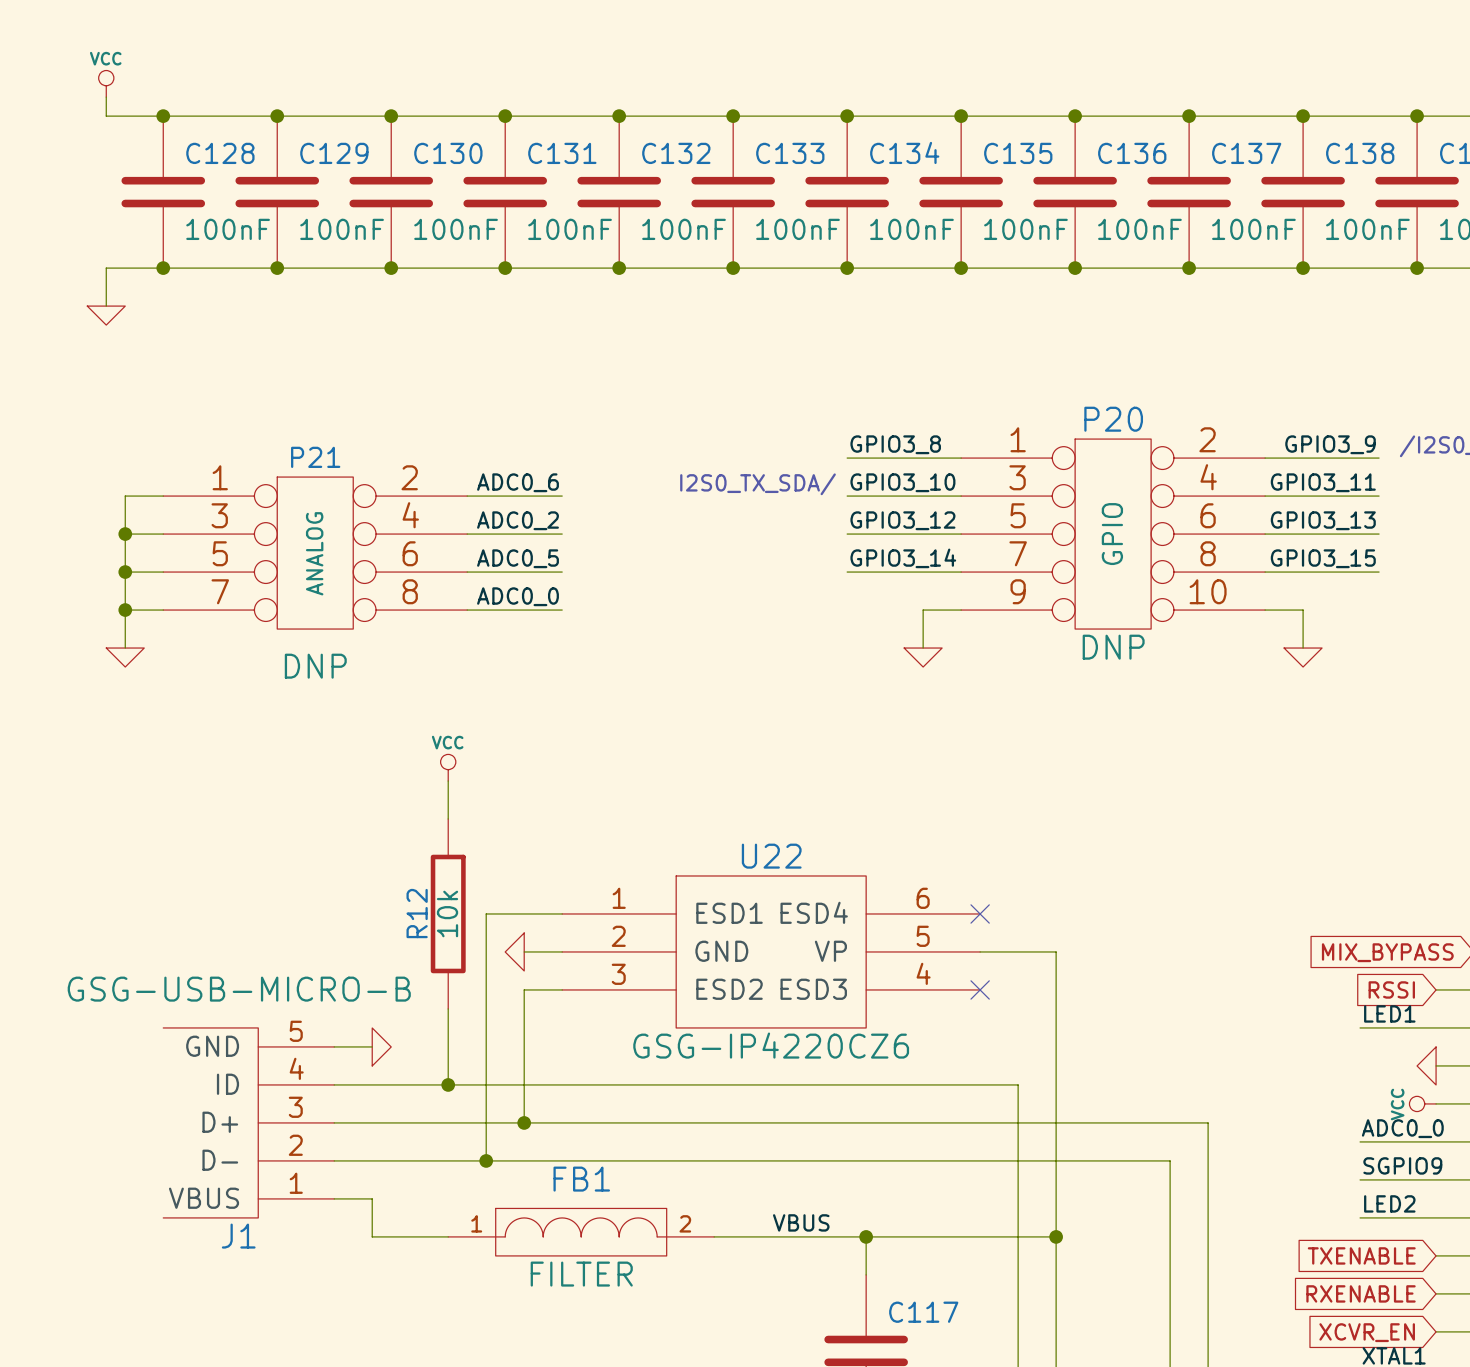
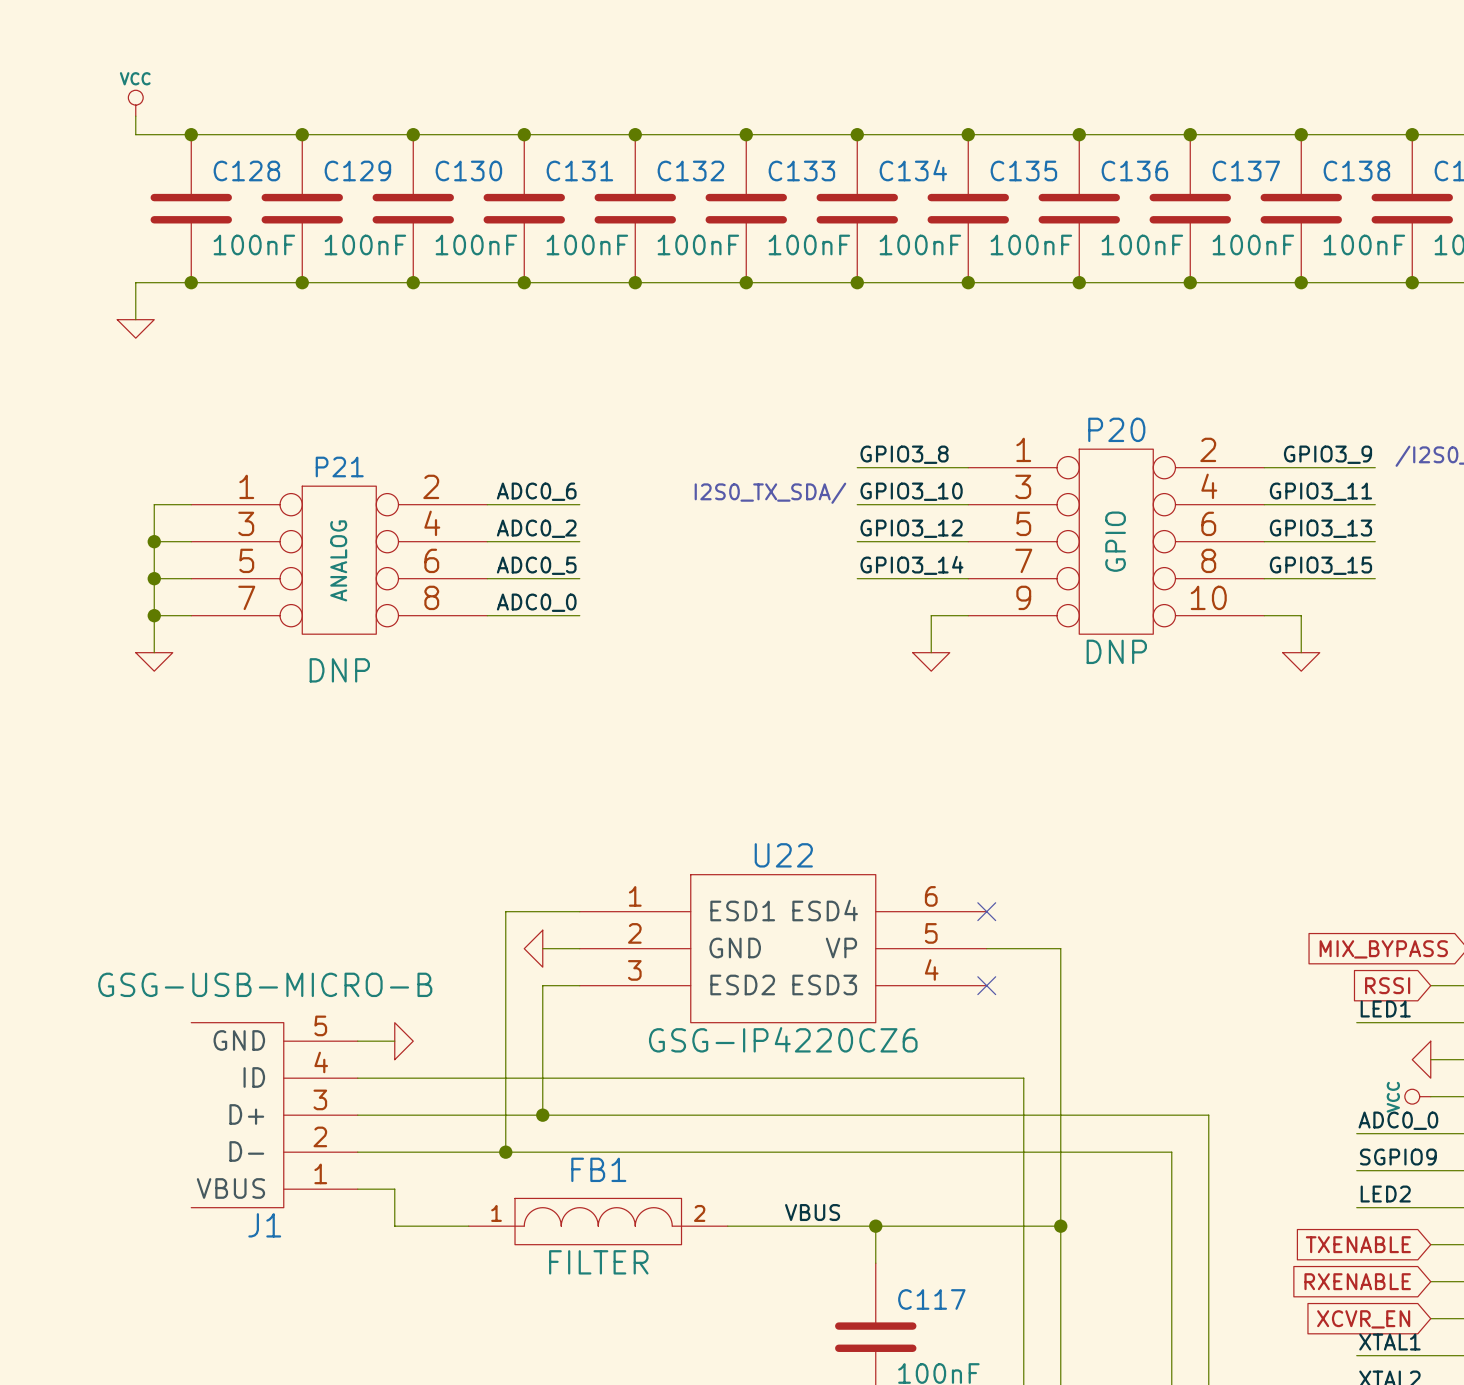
power symbol: VCC (448, 767) -> none
wire: (448, 781) (448, 819) -> none
R12: 10k (448, 913) -> none
wire: (448, 1008) (448, 1084) -> none
junction: (448, 1084) -> none

